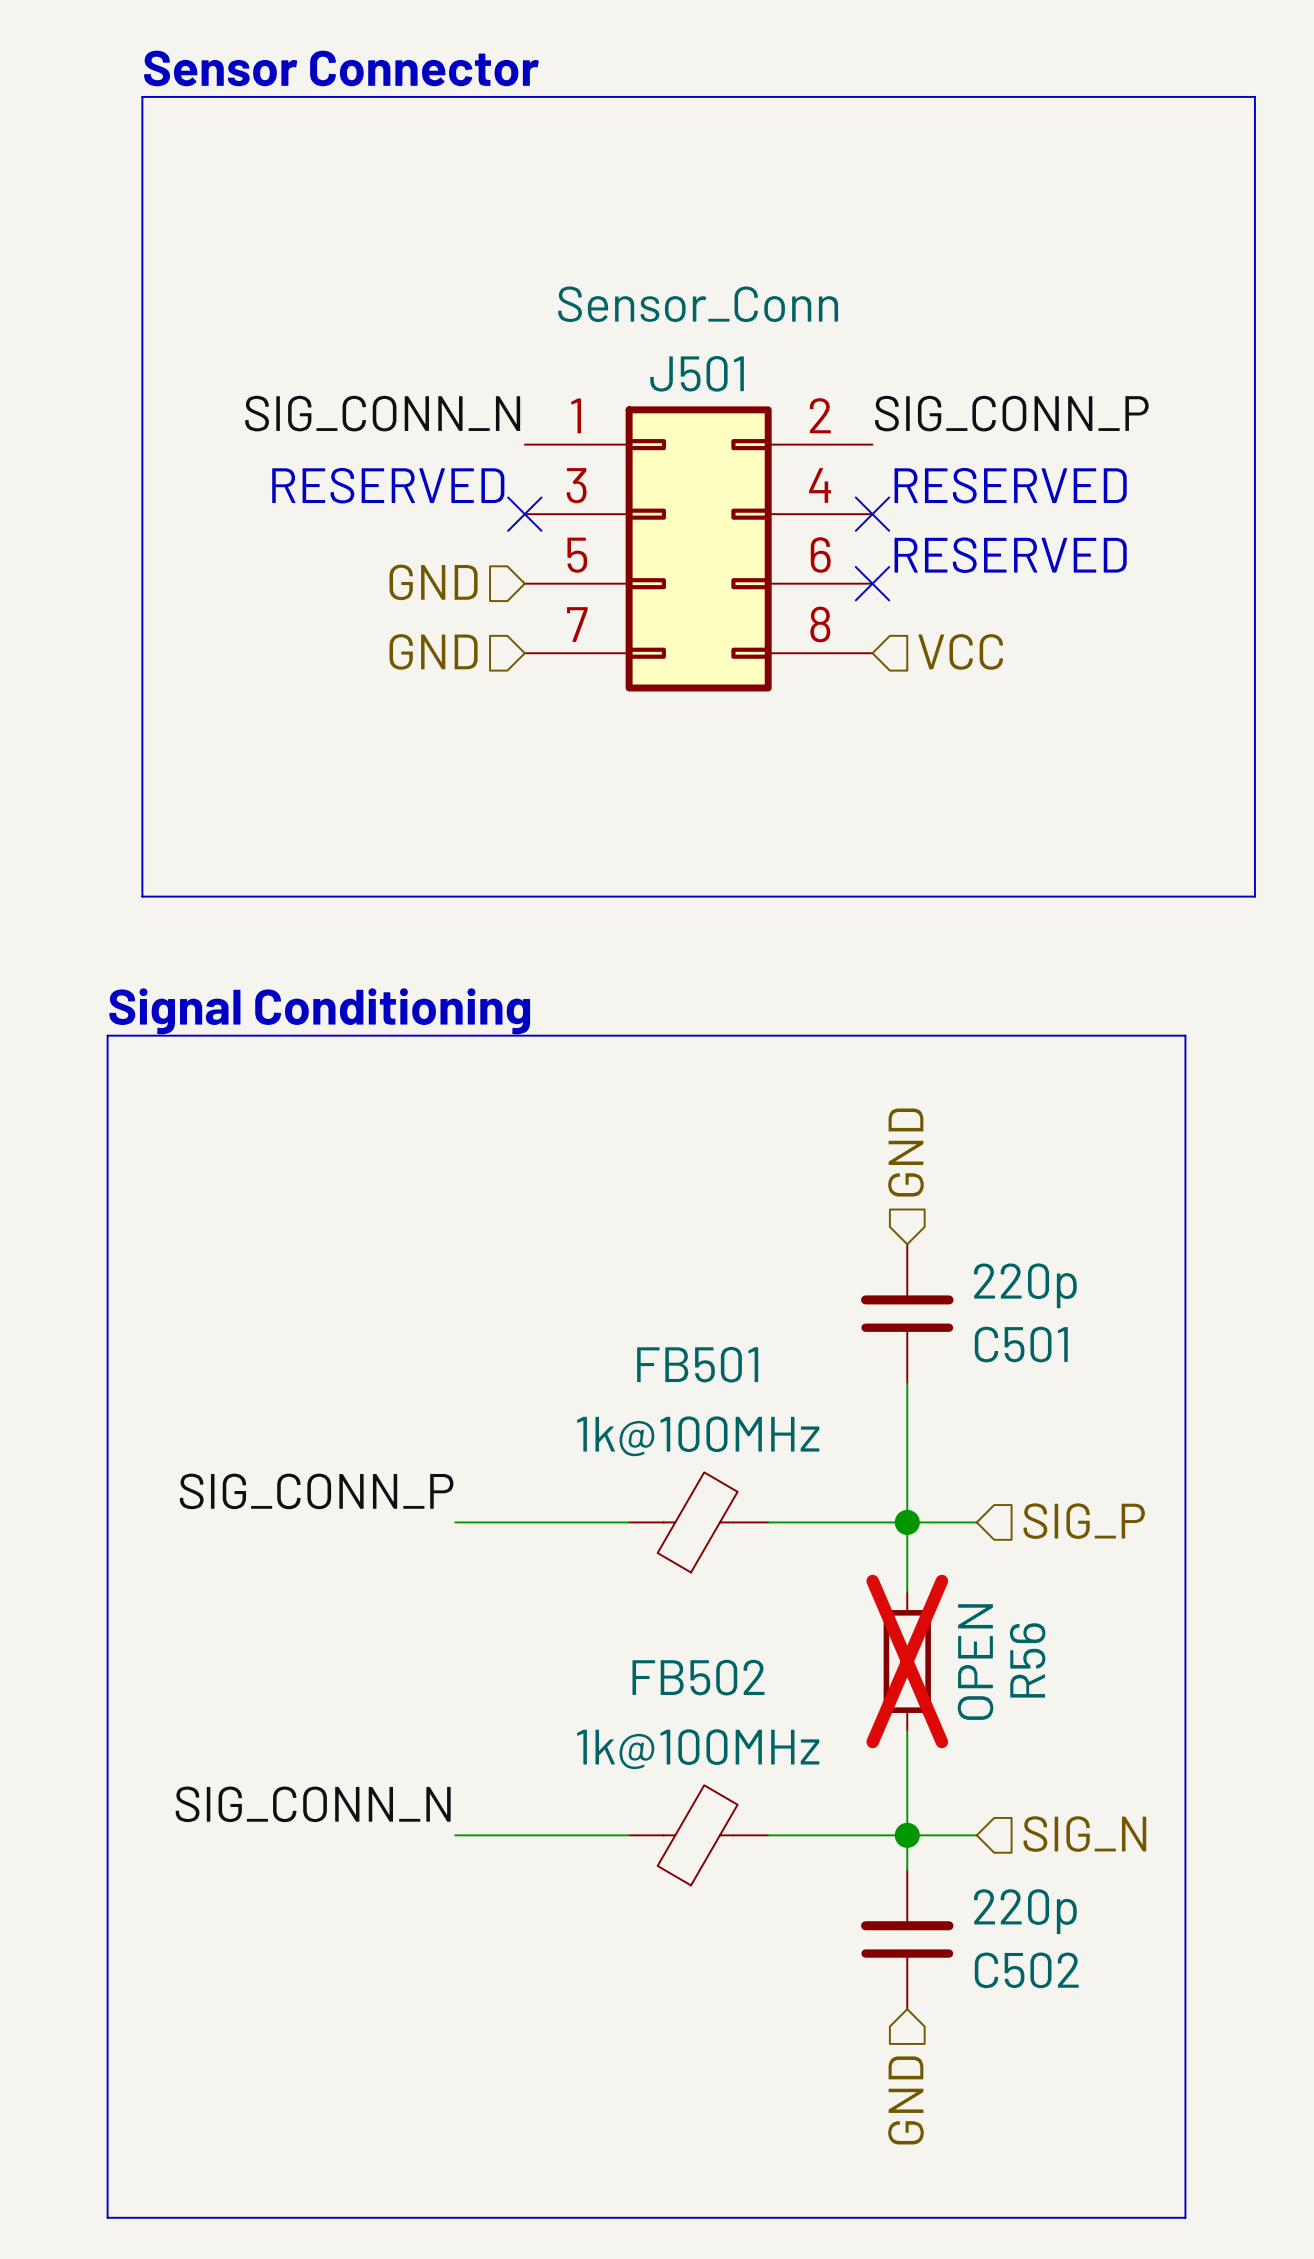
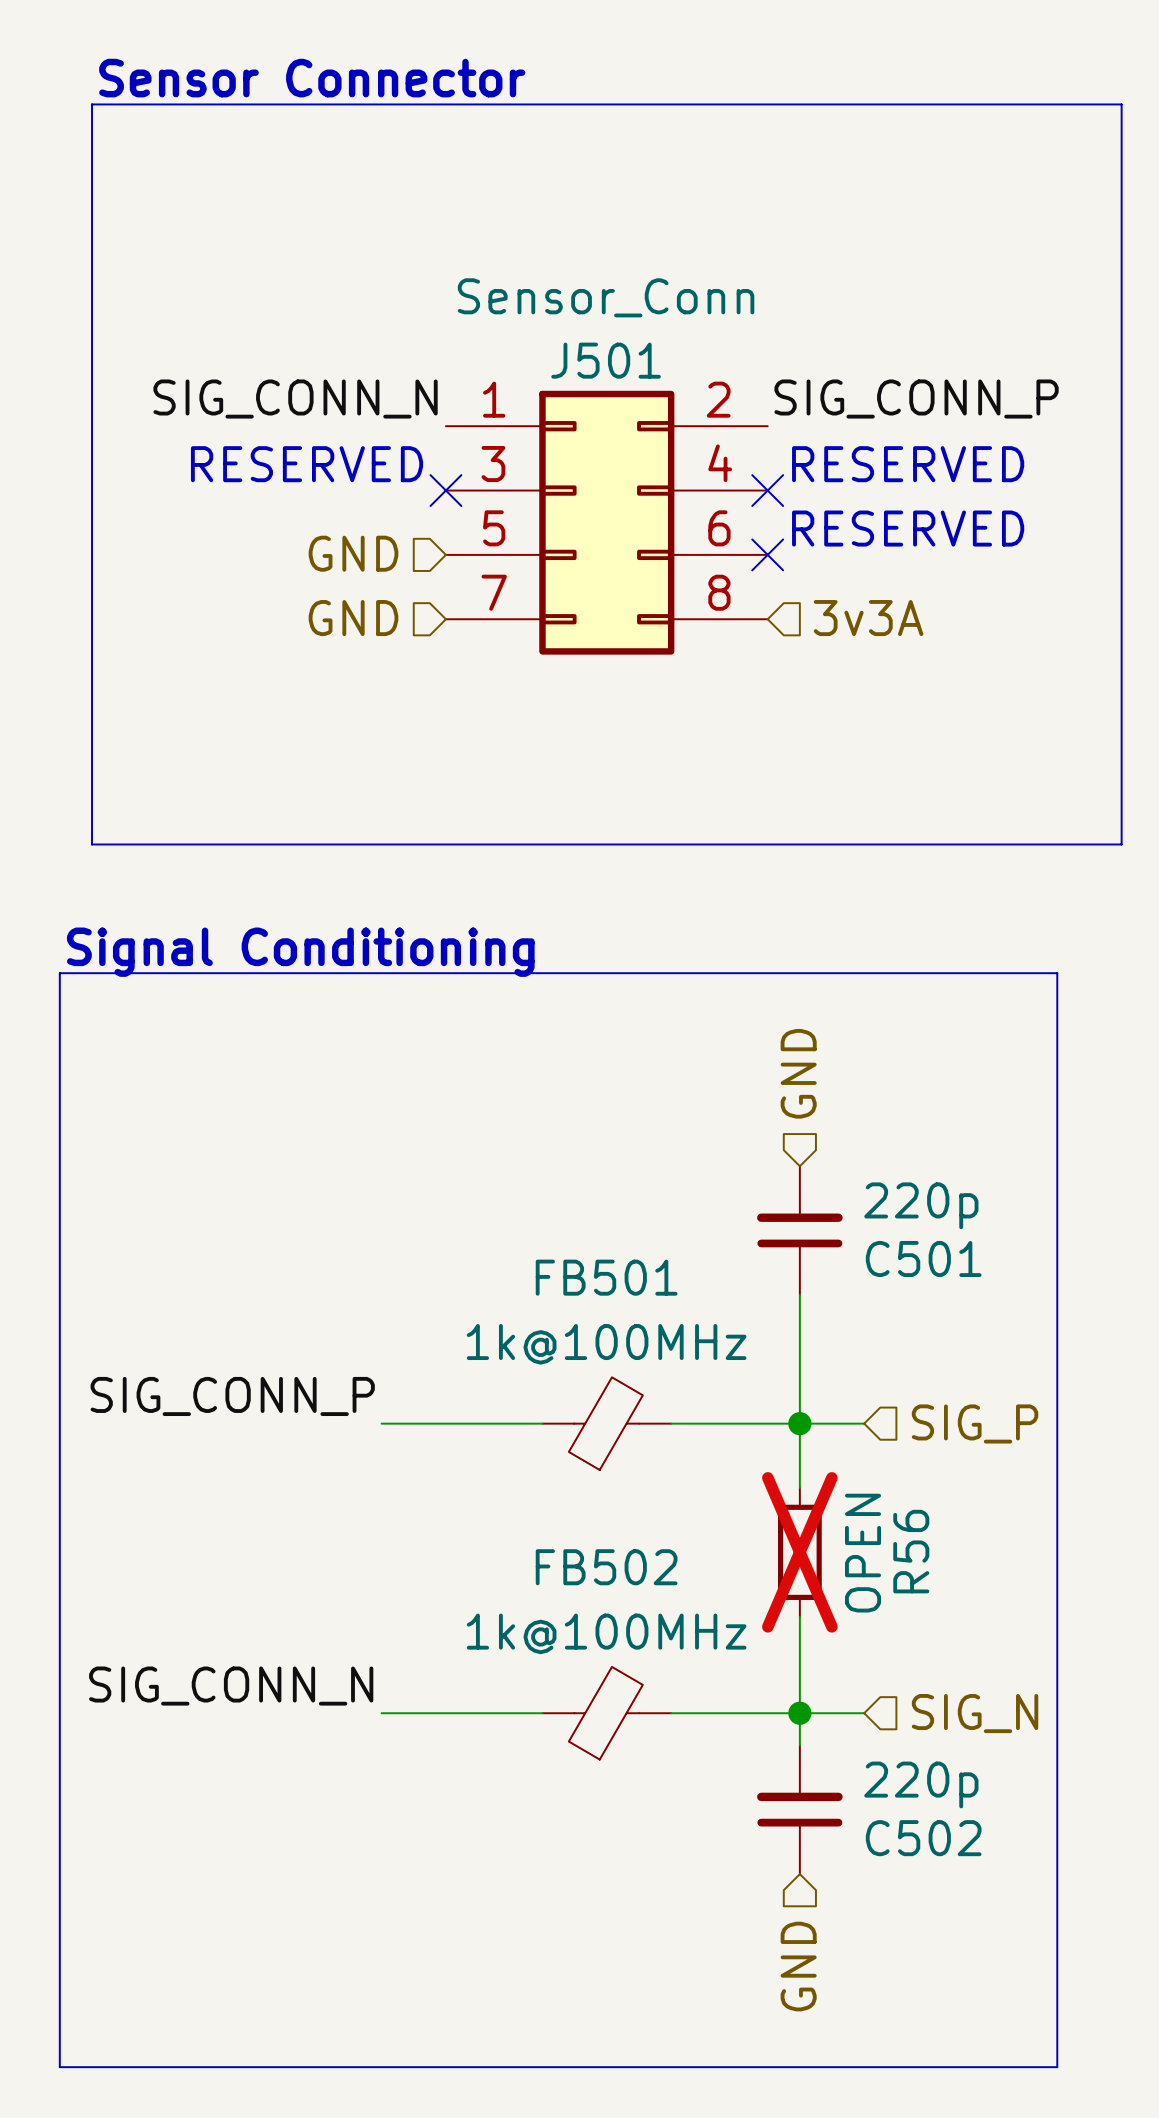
hierarchical label: VCC (960, 651) -> 3v3A (868, 618)

